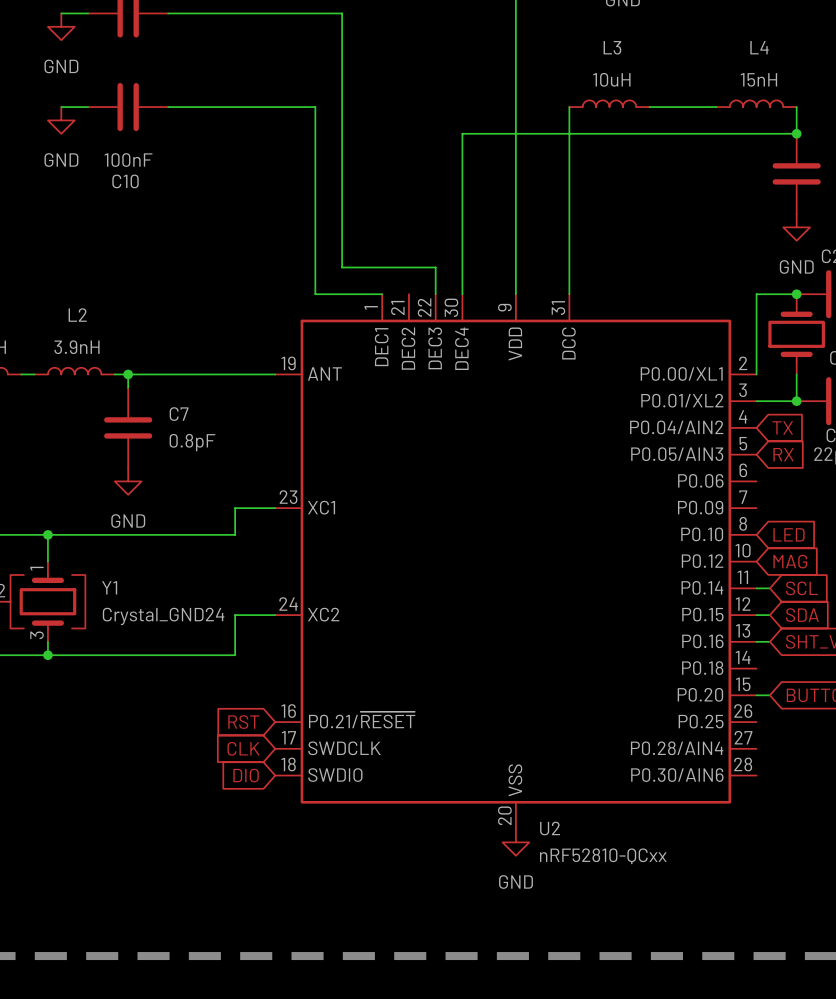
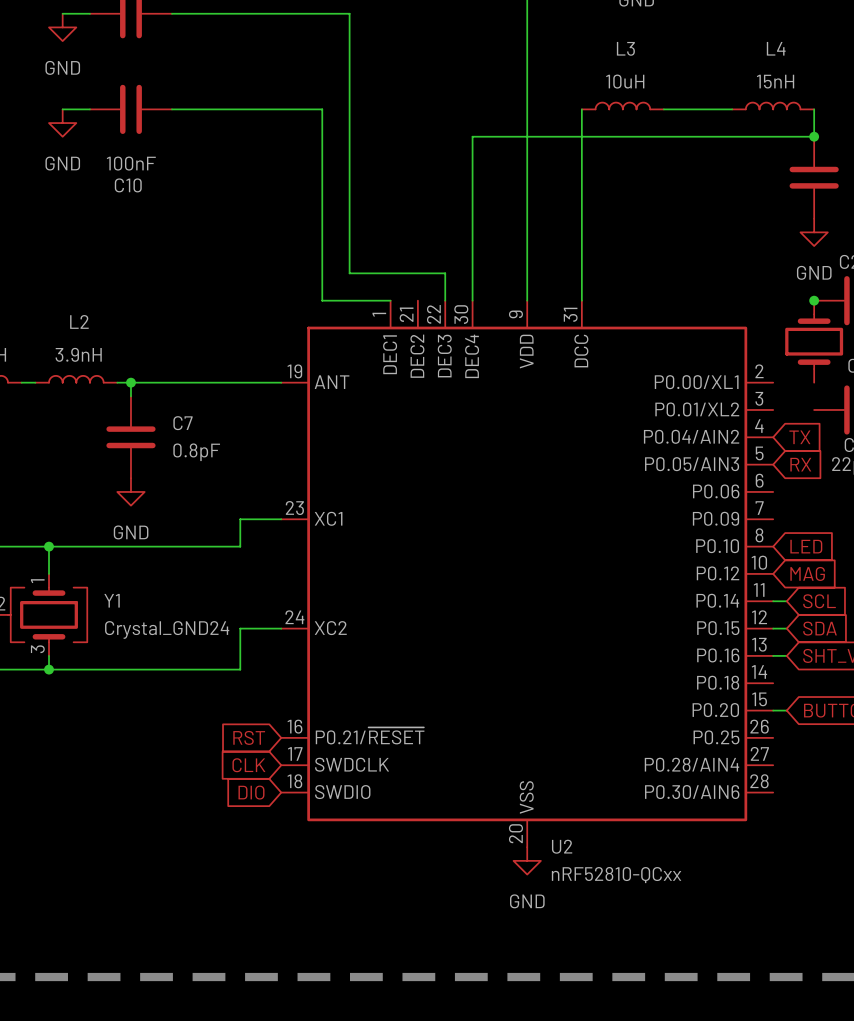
wire: (796, 294) (756, 294) (756, 374) -> none
wire: (796, 374) (796, 401) (756, 401) -> none
junction: (796, 401) -> none

